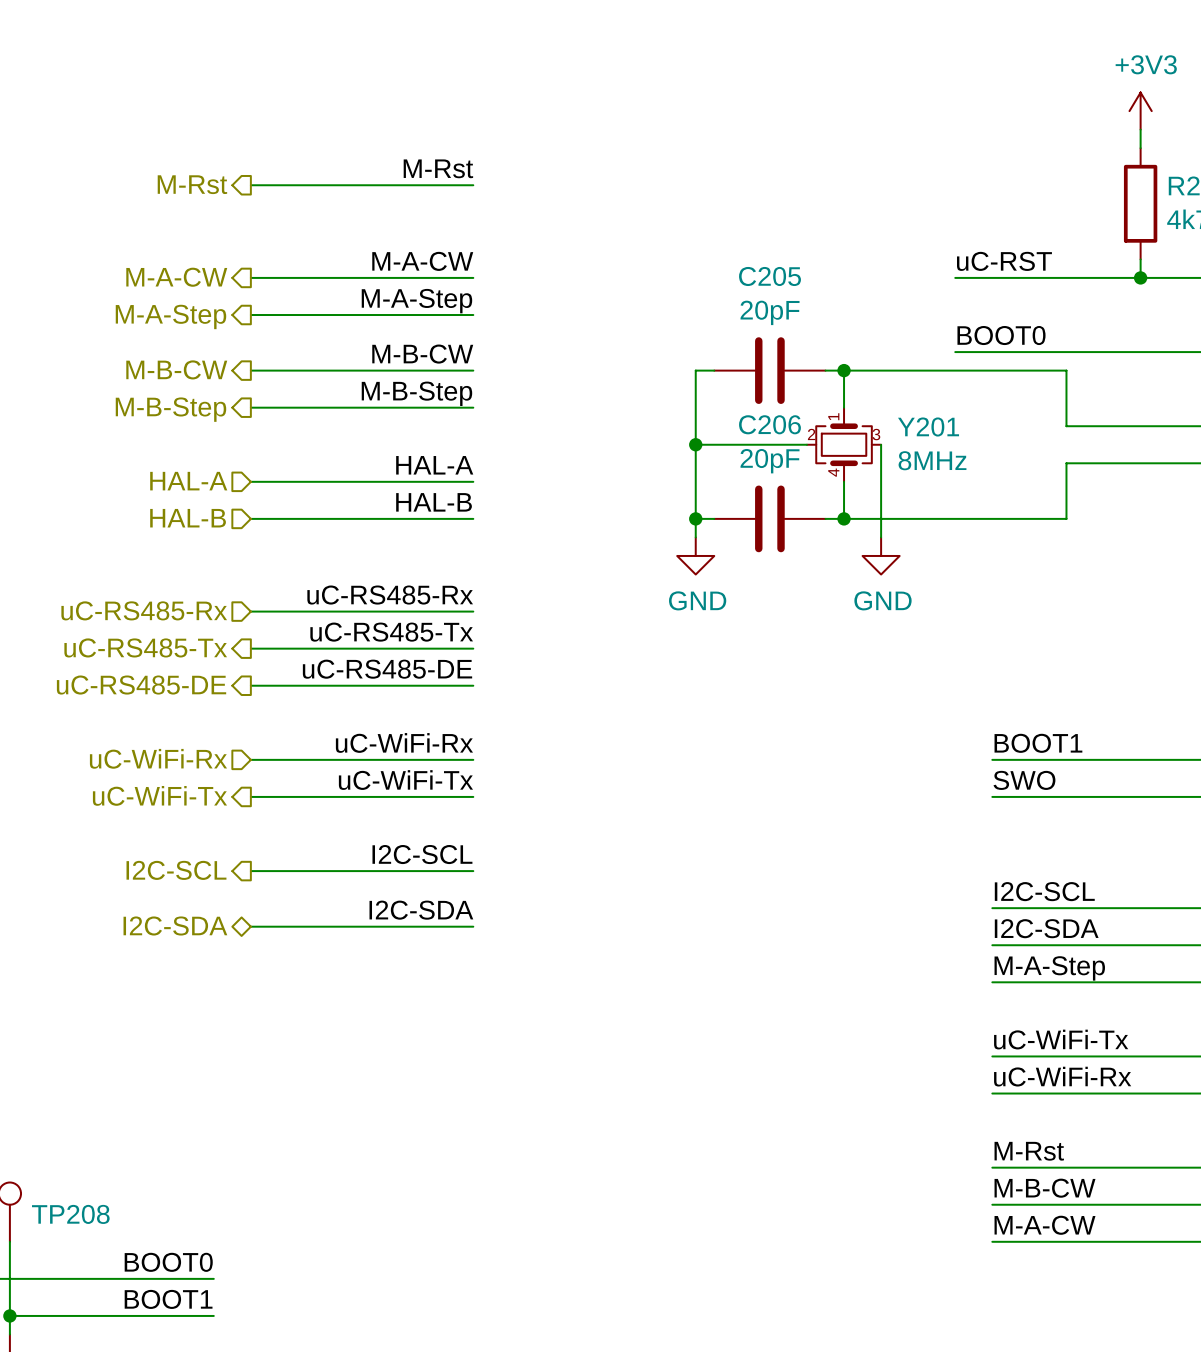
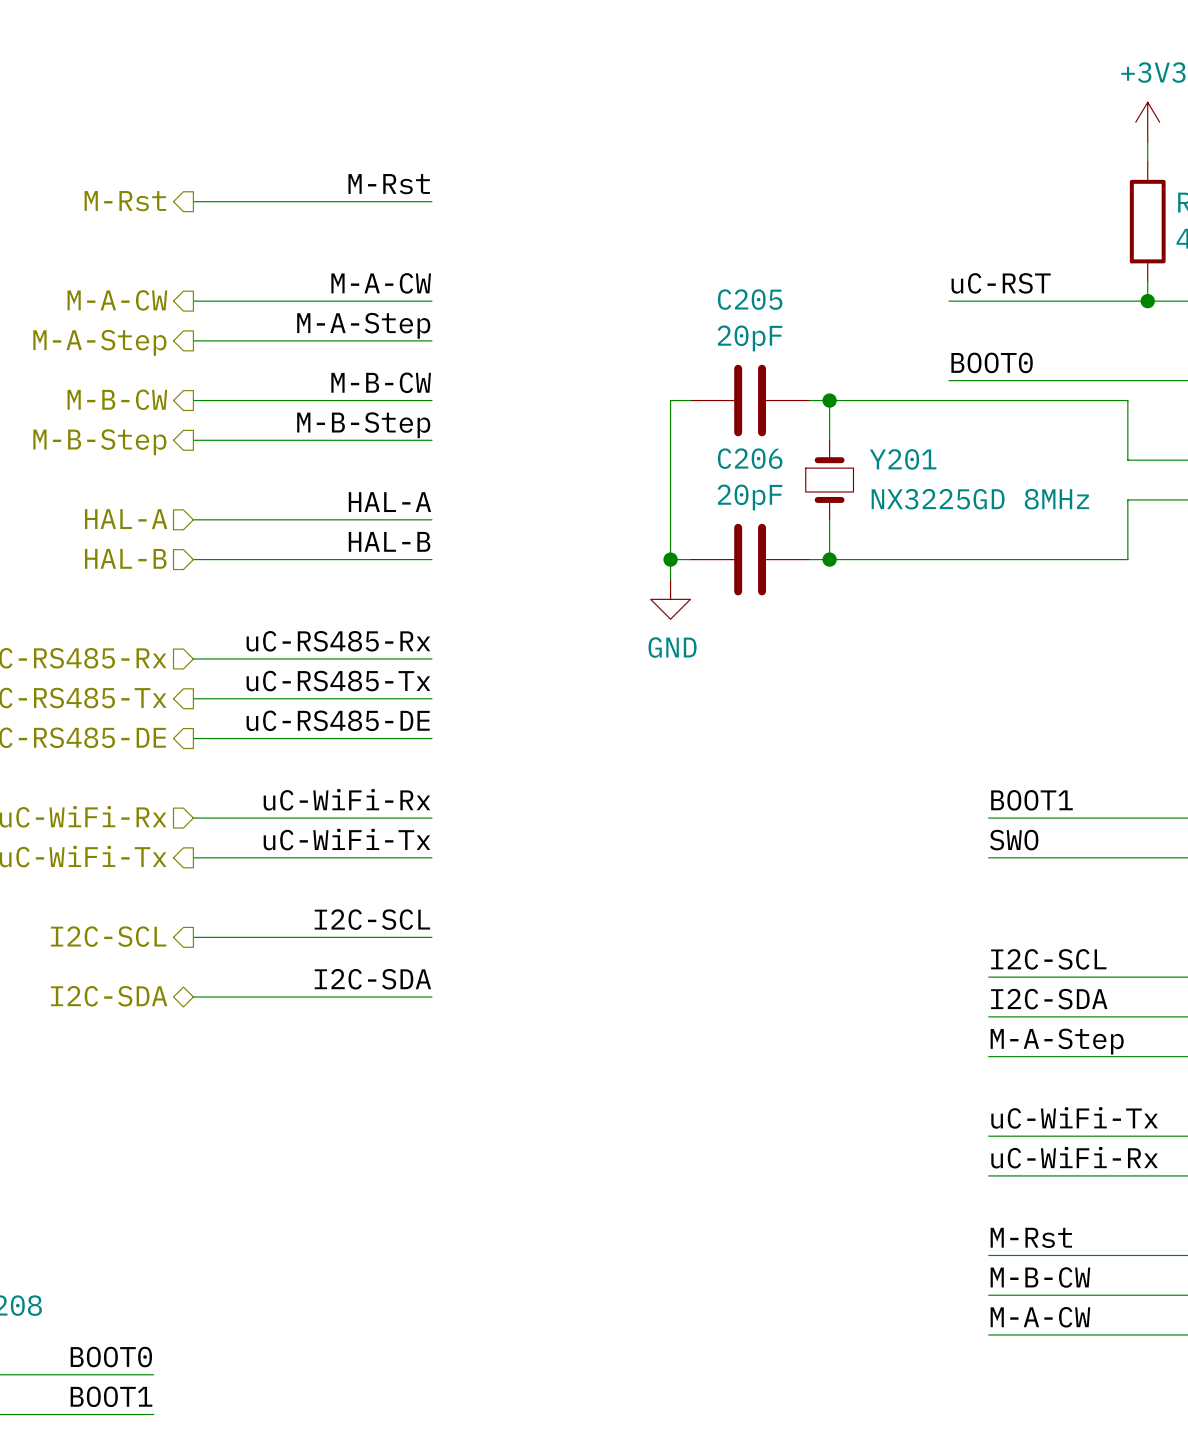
wire: (1066, 370) (1066, 426) (1122, 426) -> (1068, 400) (1127, 400) (1127, 460)
Y201 symbol: [806, 407, 882, 482] -> [805, 440, 854, 520]
wire: (695, 444) (806, 444) -> none
junction: (695, 444) -> none
wire: (881, 444) (881, 537) -> none
Y201 value: 8MHz (932, 460) -> NX3225GD 8MHz (980, 499)
wire: (1122, 463) (1066, 463) (1066, 518) -> (1127, 499) (1127, 559) (1068, 559)
power symbol: GND (881, 555) -> none

